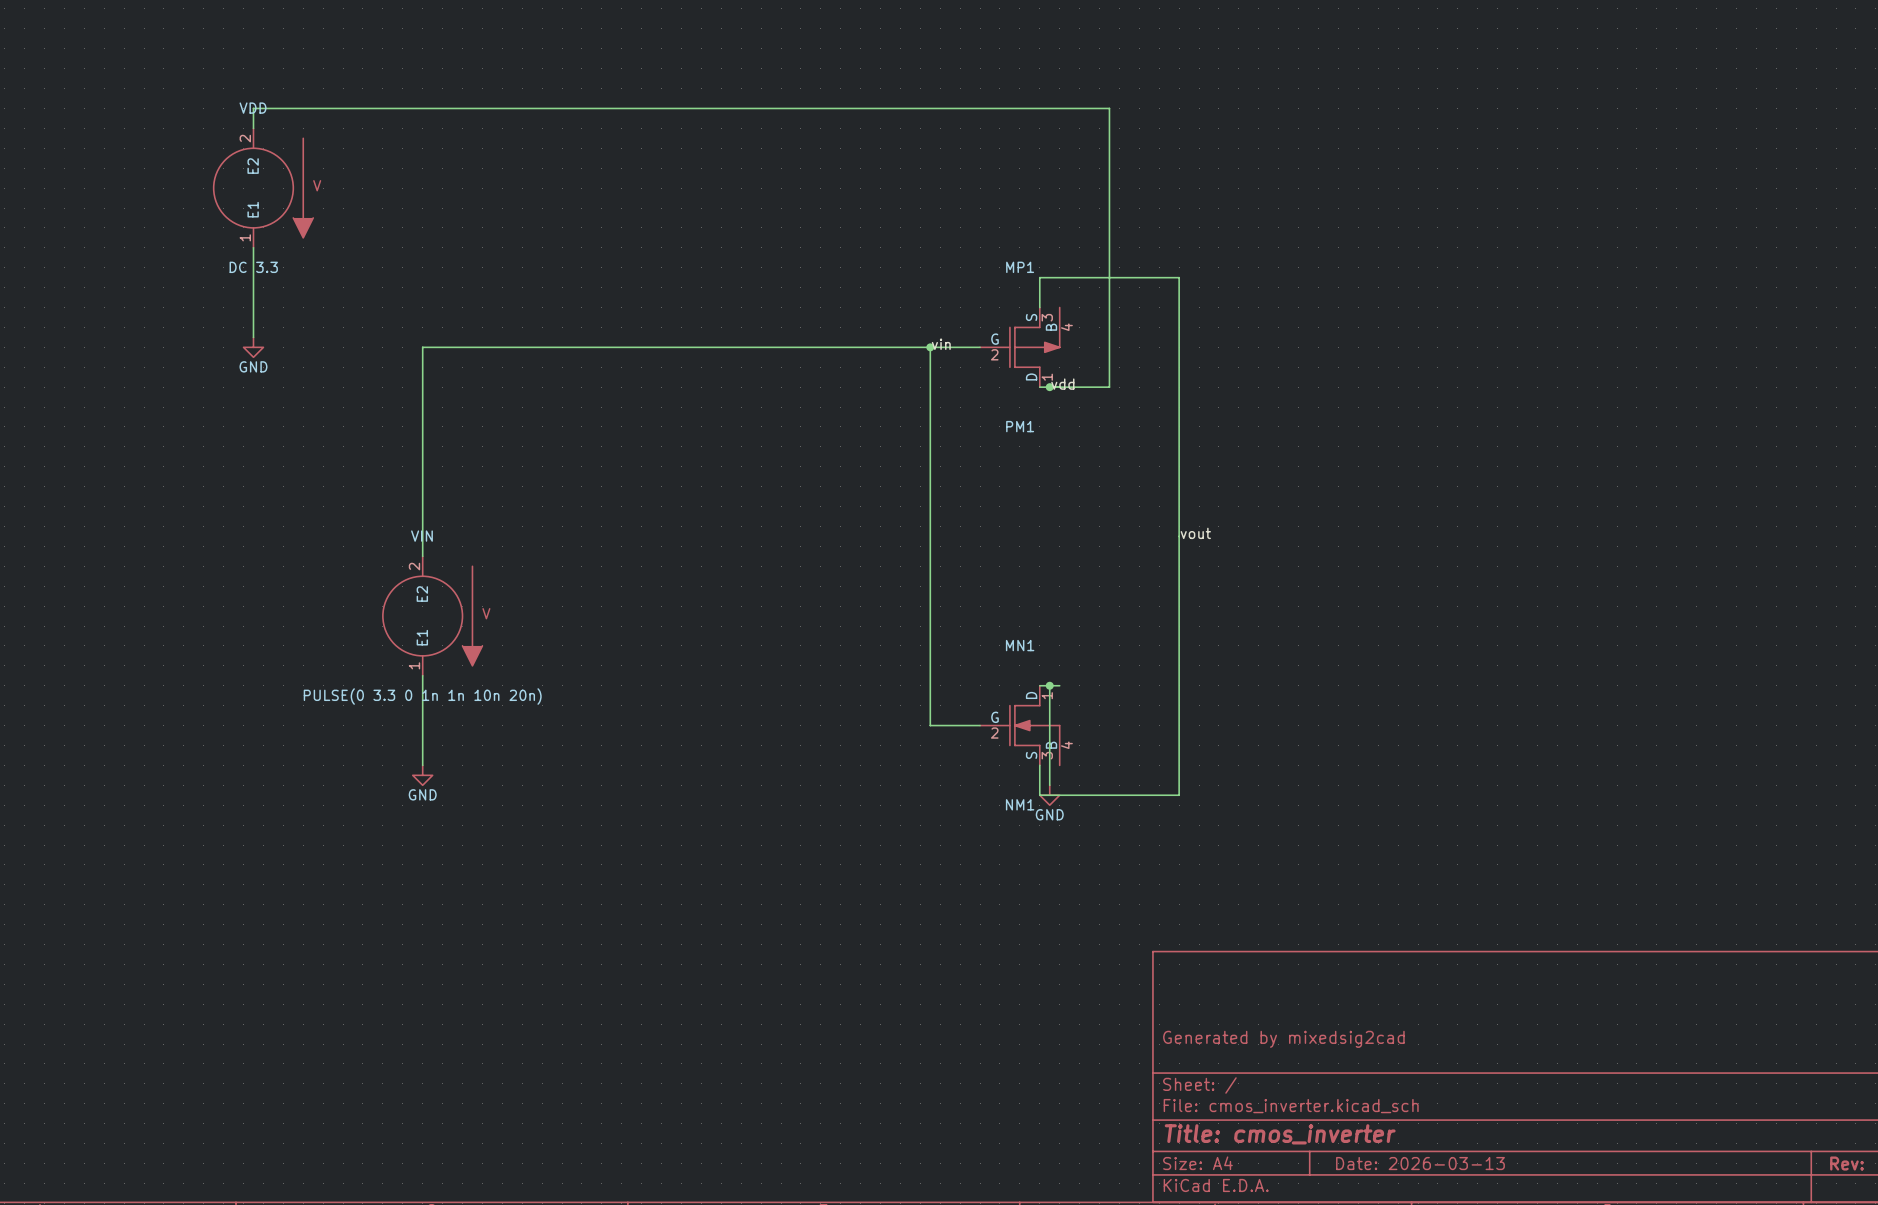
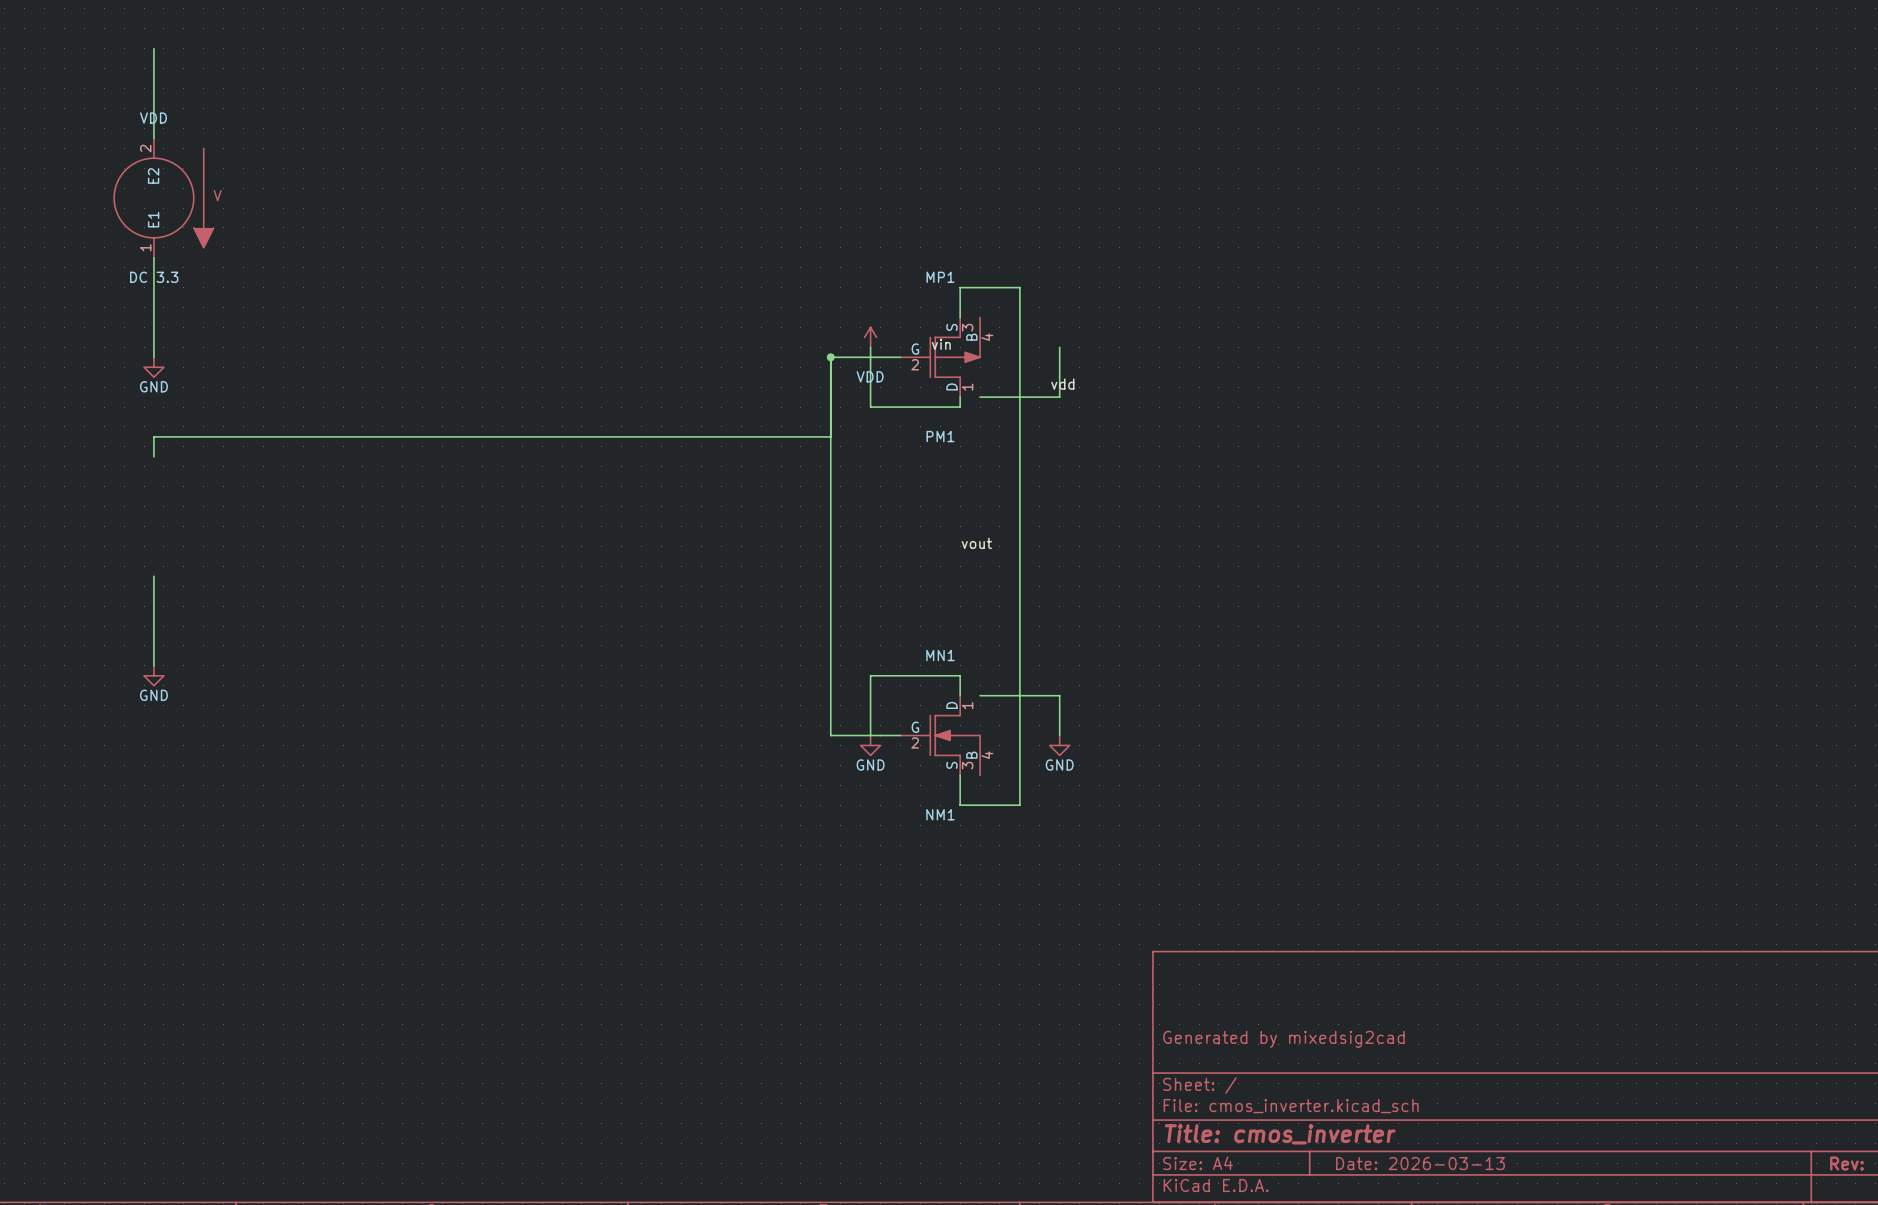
wire: none -> (153, 48) (153, 138)
wire: (253, 128) (253, 108) (1109, 108) (1109, 387) (1039, 387) -> none
VDD position: (263, 188) -> (163, 198)
wire: (253, 247) (253, 337) -> none
wire: none -> (153, 257) (153, 357)
wire: (1039, 307) (1039, 277) (1179, 277) (1179, 795) (1039, 795) (1039, 765) -> none
wire: none -> (960, 317) (960, 287) (1019, 287) (1019, 805) (960, 805) (960, 775)
power symbol: none -> VDD (870, 337)
power symbol position: GND (253, 347) -> GND (153, 367)
wire: none -> (870, 347) (870, 407) (960, 407) (960, 397)
wire: (930, 347) (930, 725) (980, 725) -> none
junction: (930, 347) -> none
wire: (980, 347) (422, 347) (422, 556) -> none
MP1 position: (1019, 347) -> (940, 357)
wire: none -> (1059, 347) (1059, 397) (980, 397)
junction: none -> (830, 357)
wire: none -> (900, 357) (830, 357) (830, 735) (900, 735)
junction: (1049, 387) -> none
wire: none -> (830, 436) (153, 436) (153, 456)
label: vout (1195, 533) -> none
label: none -> vout (976, 543)
wire: none -> (153, 576) (153, 665)
VIN: PULSE(0 3.3 0 1n 1n 10n 20n) (432, 616) -> none
power symbol: none -> GND (153, 675)
wire: (422, 675) (422, 765) -> none
wire: (1039, 685) (1059, 685) -> none
wire: (1049, 685) (1049, 785) -> none
junction: (1049, 685) -> none
wire: none -> (960, 695) (960, 675) (870, 675) (870, 735)
wire: none -> (980, 695) (1059, 695) (1059, 735)
MN1 position: (1019, 725) -> (940, 735)
power symbol: none -> GND (870, 745)
power symbol: GND (422, 775) -> none
power symbol position: GND (1049, 795) -> GND (1059, 745)

